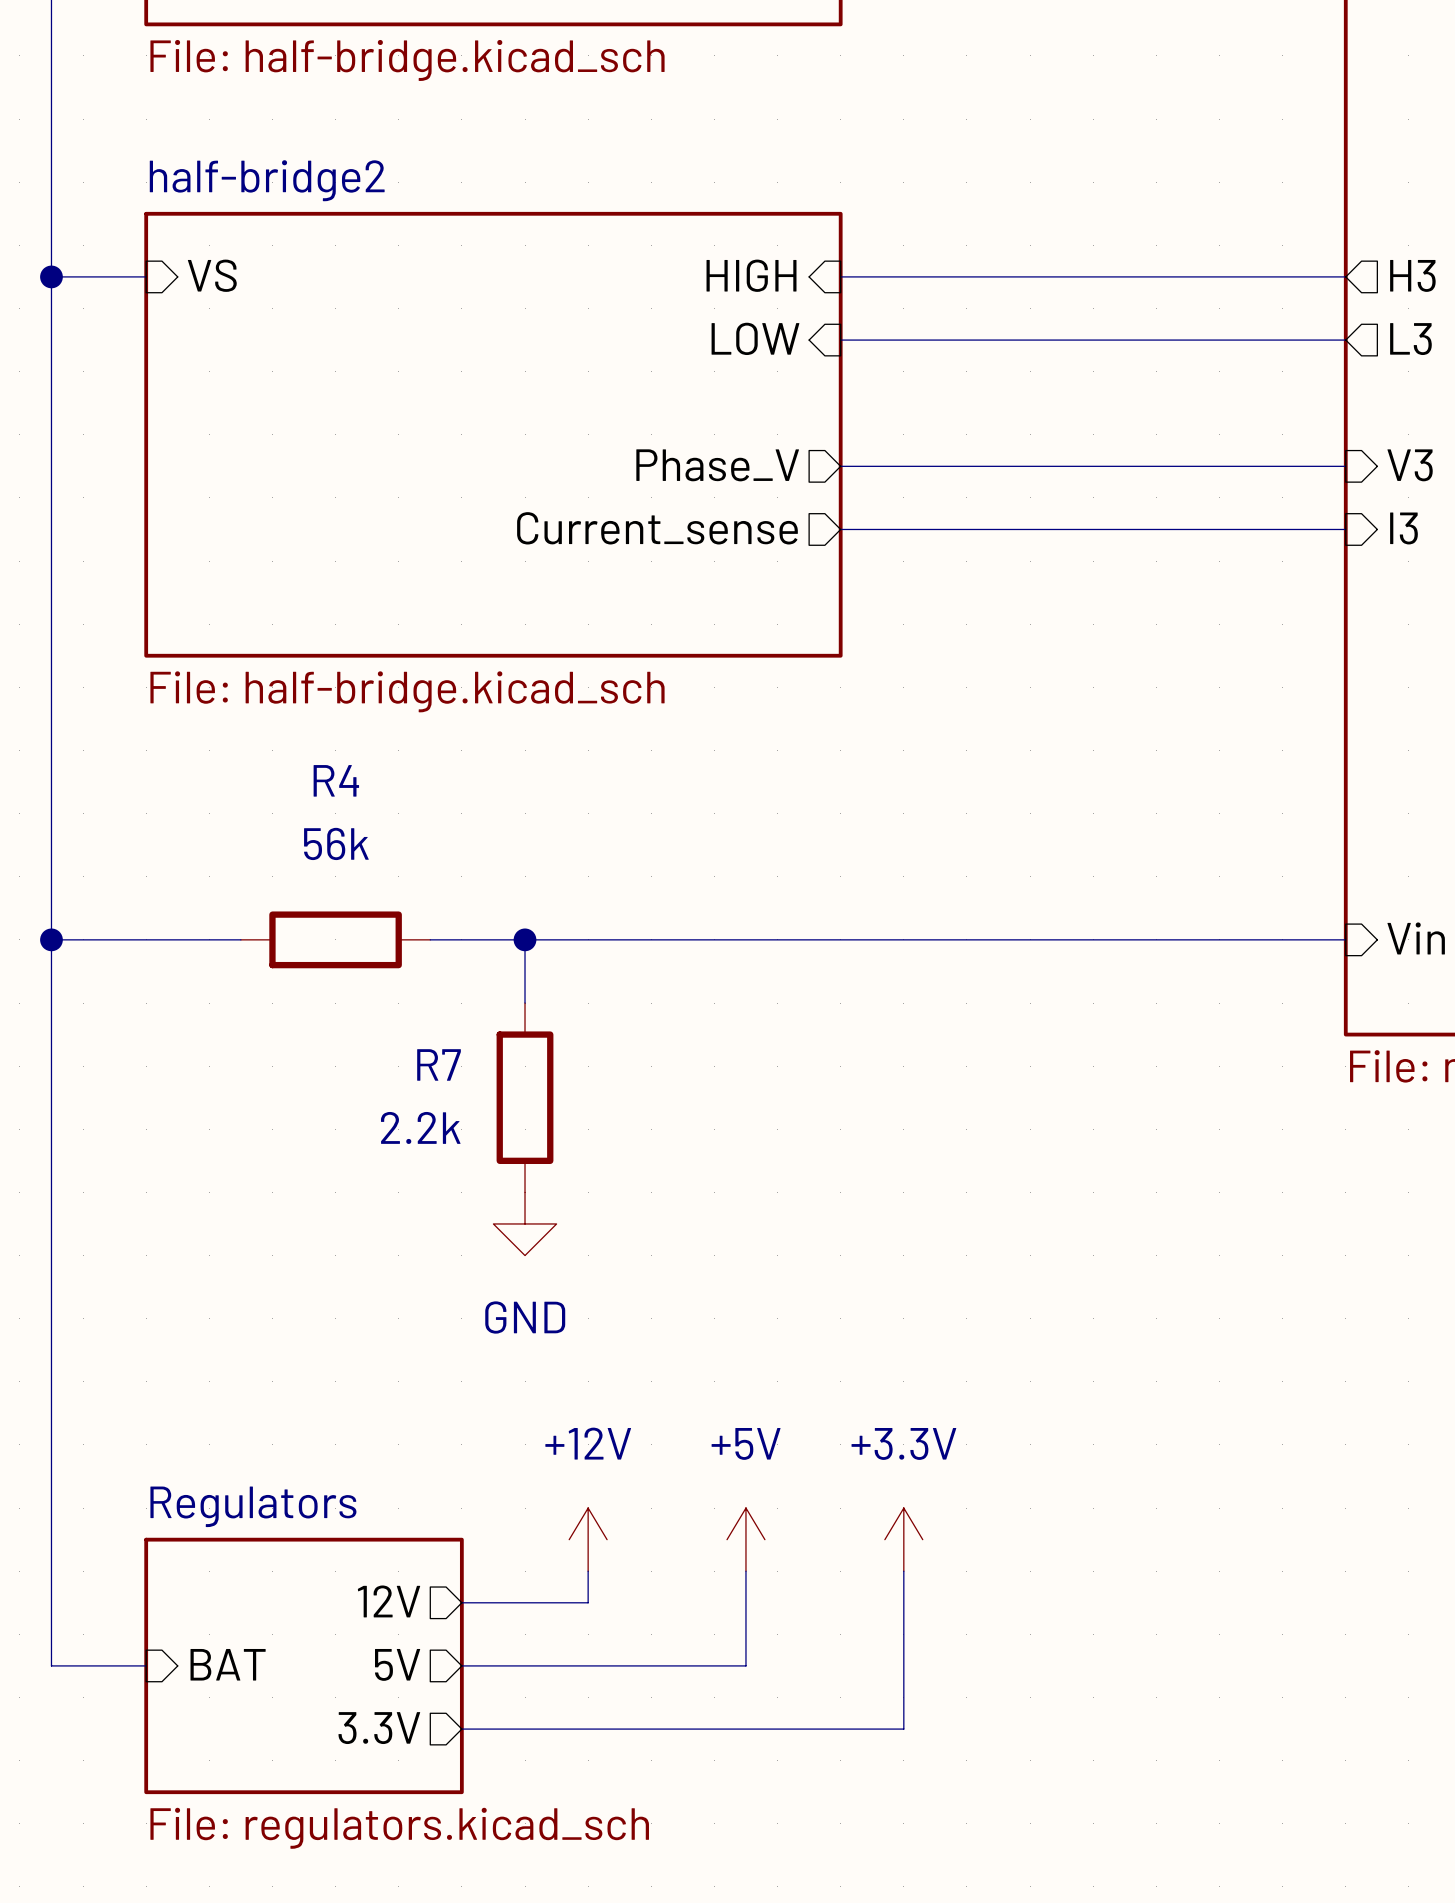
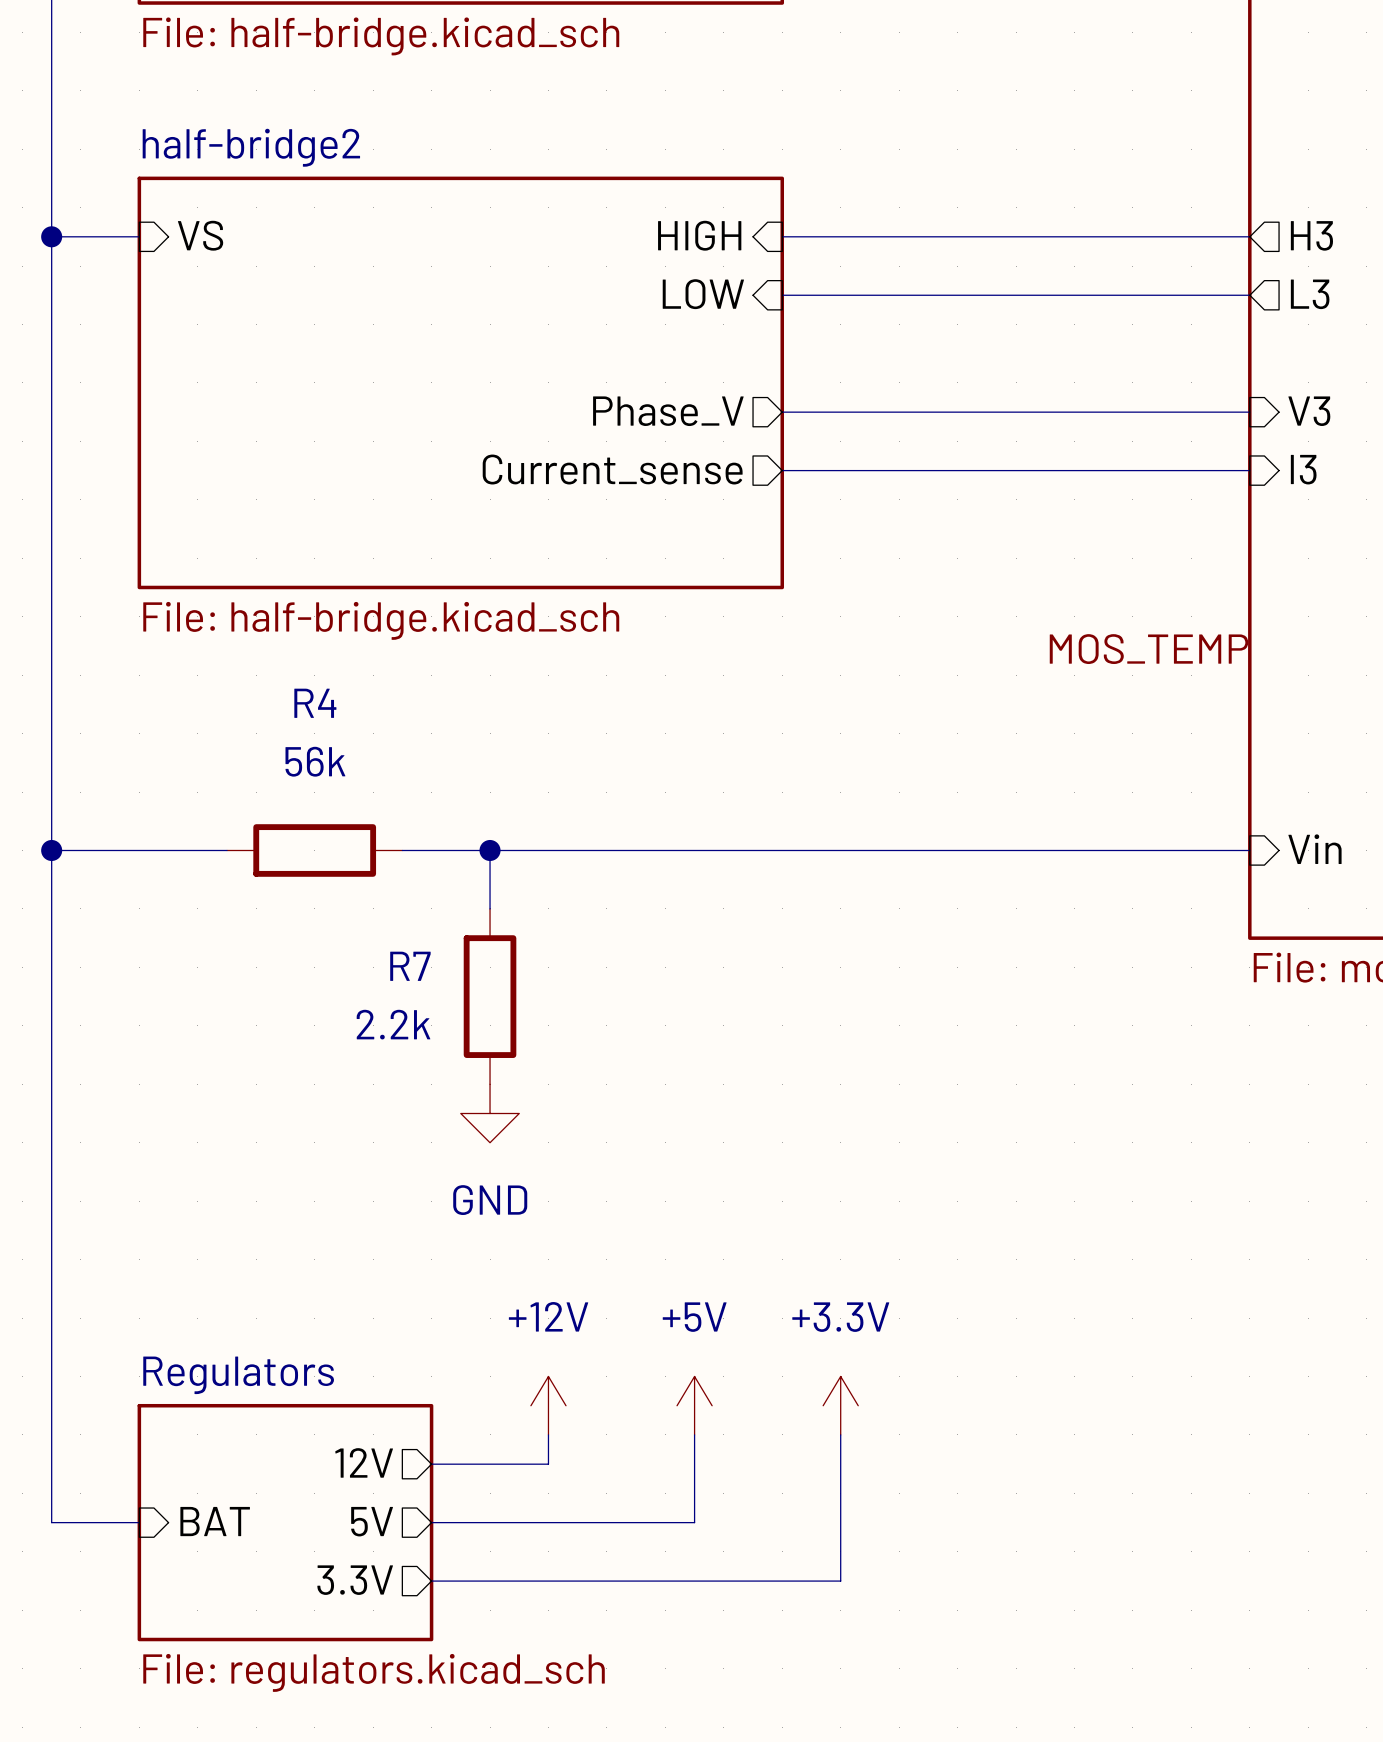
label: none -> MOS_TEMP (1149, 649)

